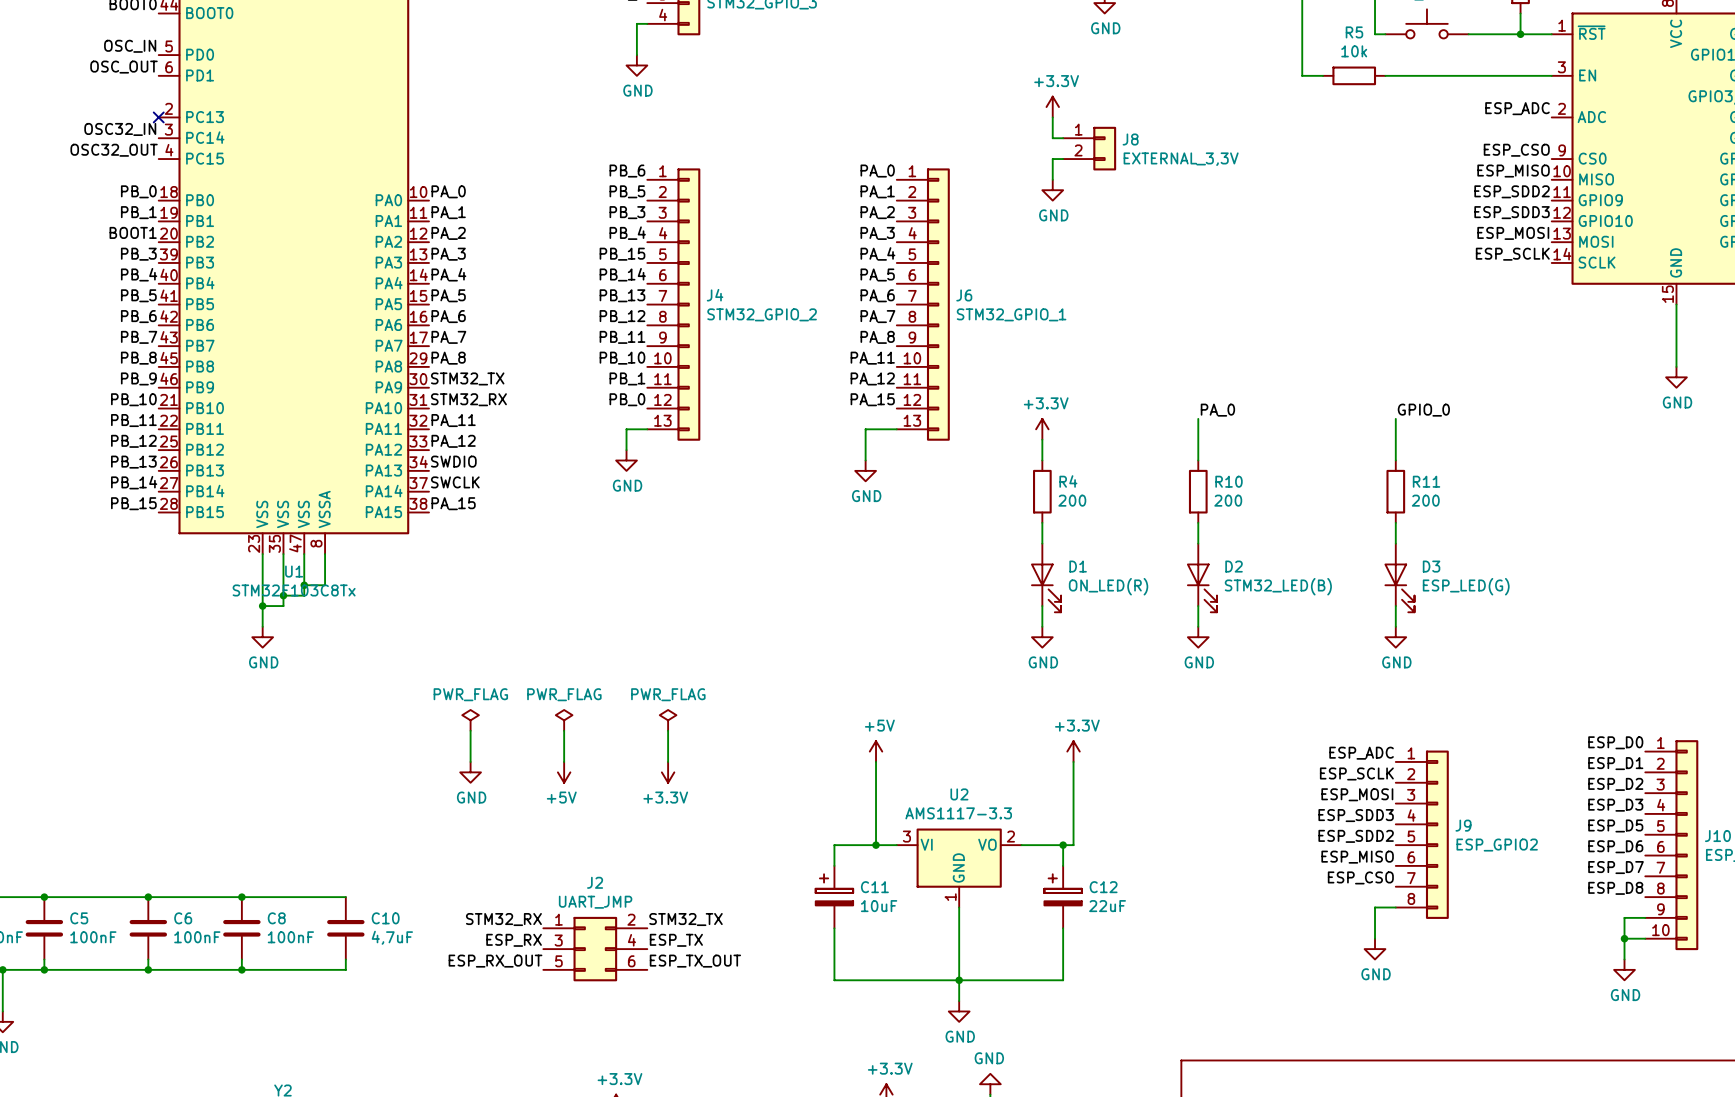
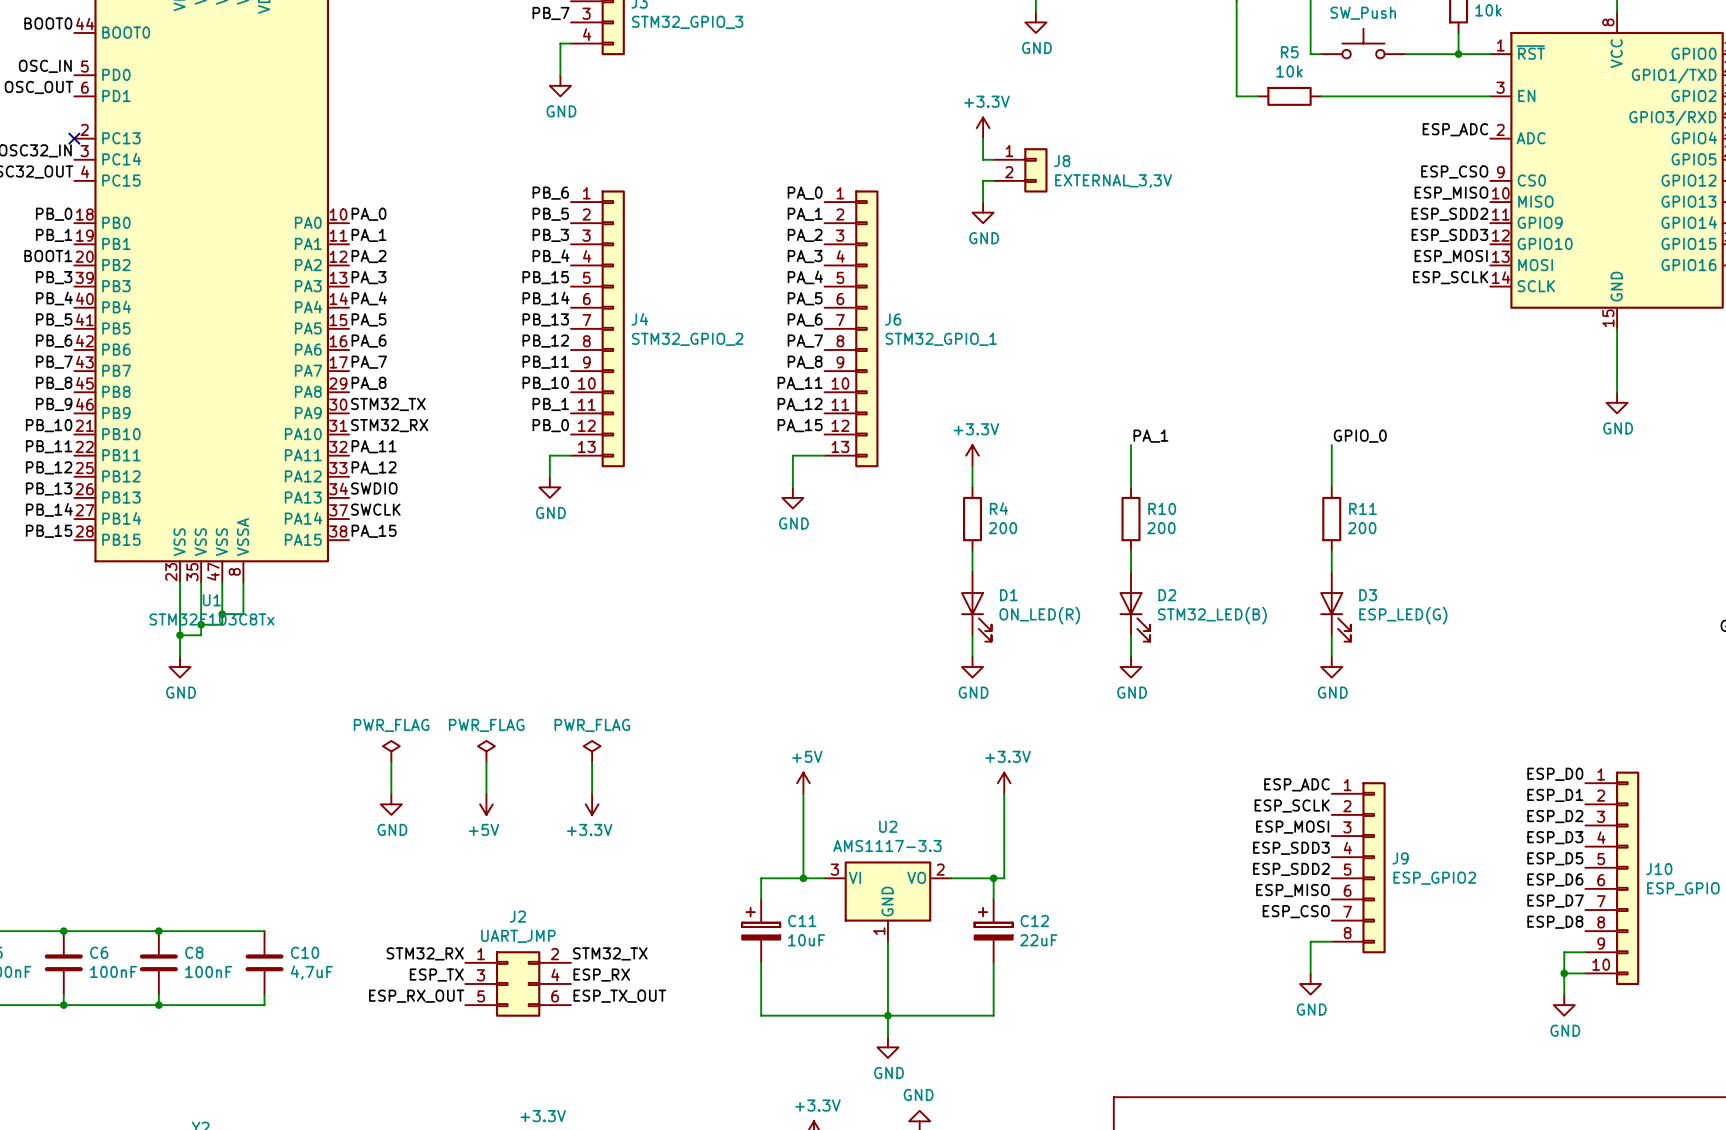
label: PA_0 (1217, 410) -> PA_1 (1150, 436)
label: ESP_RX (514, 940) -> ESP_TX (436, 975)
label: ESP_TX (676, 940) -> ESP_RX (601, 975)

